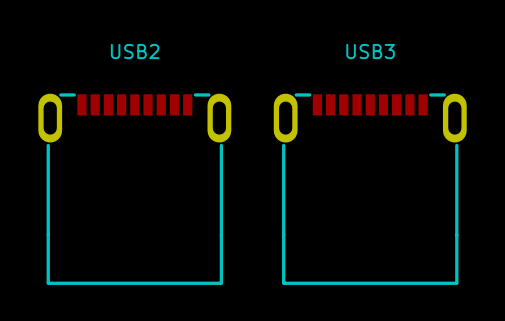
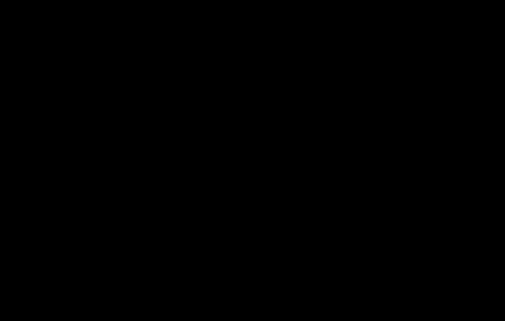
USB2: (134, 189) -> none
USB3: (370, 189) -> none

